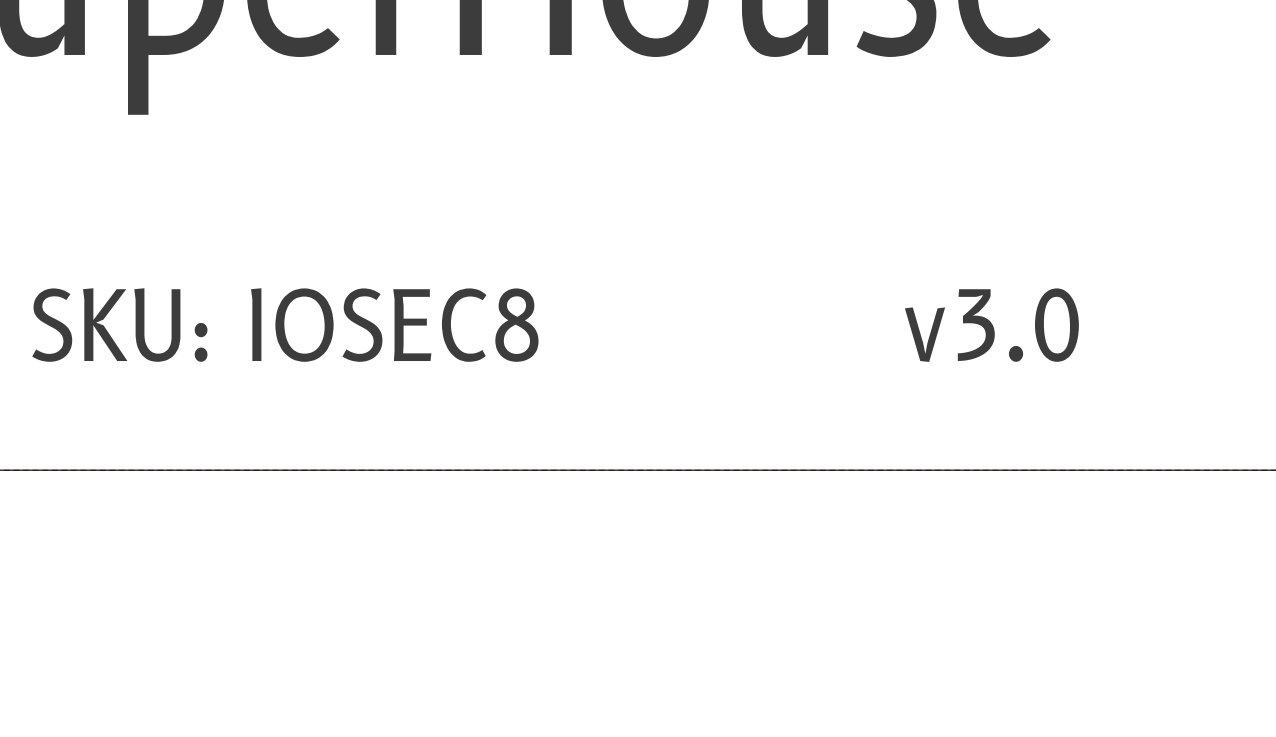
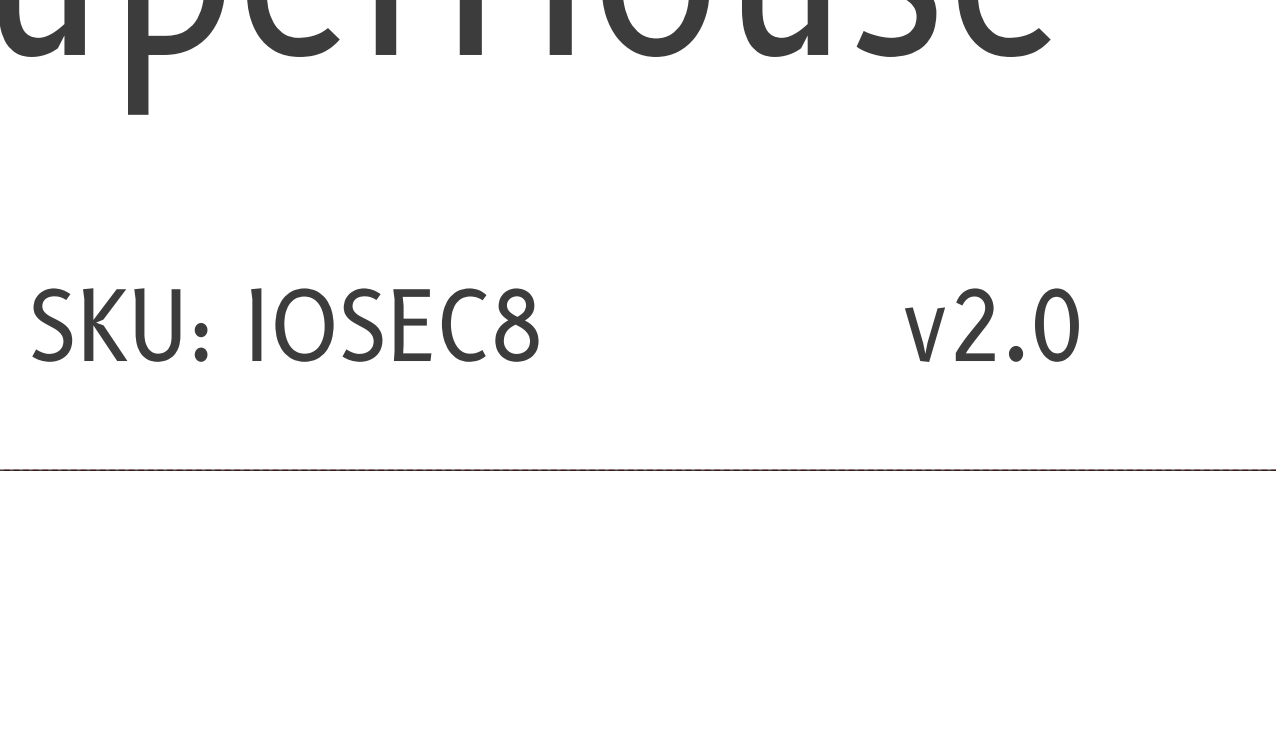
text: v3.0 (991, 325) -> v2.0 (991, 325)

